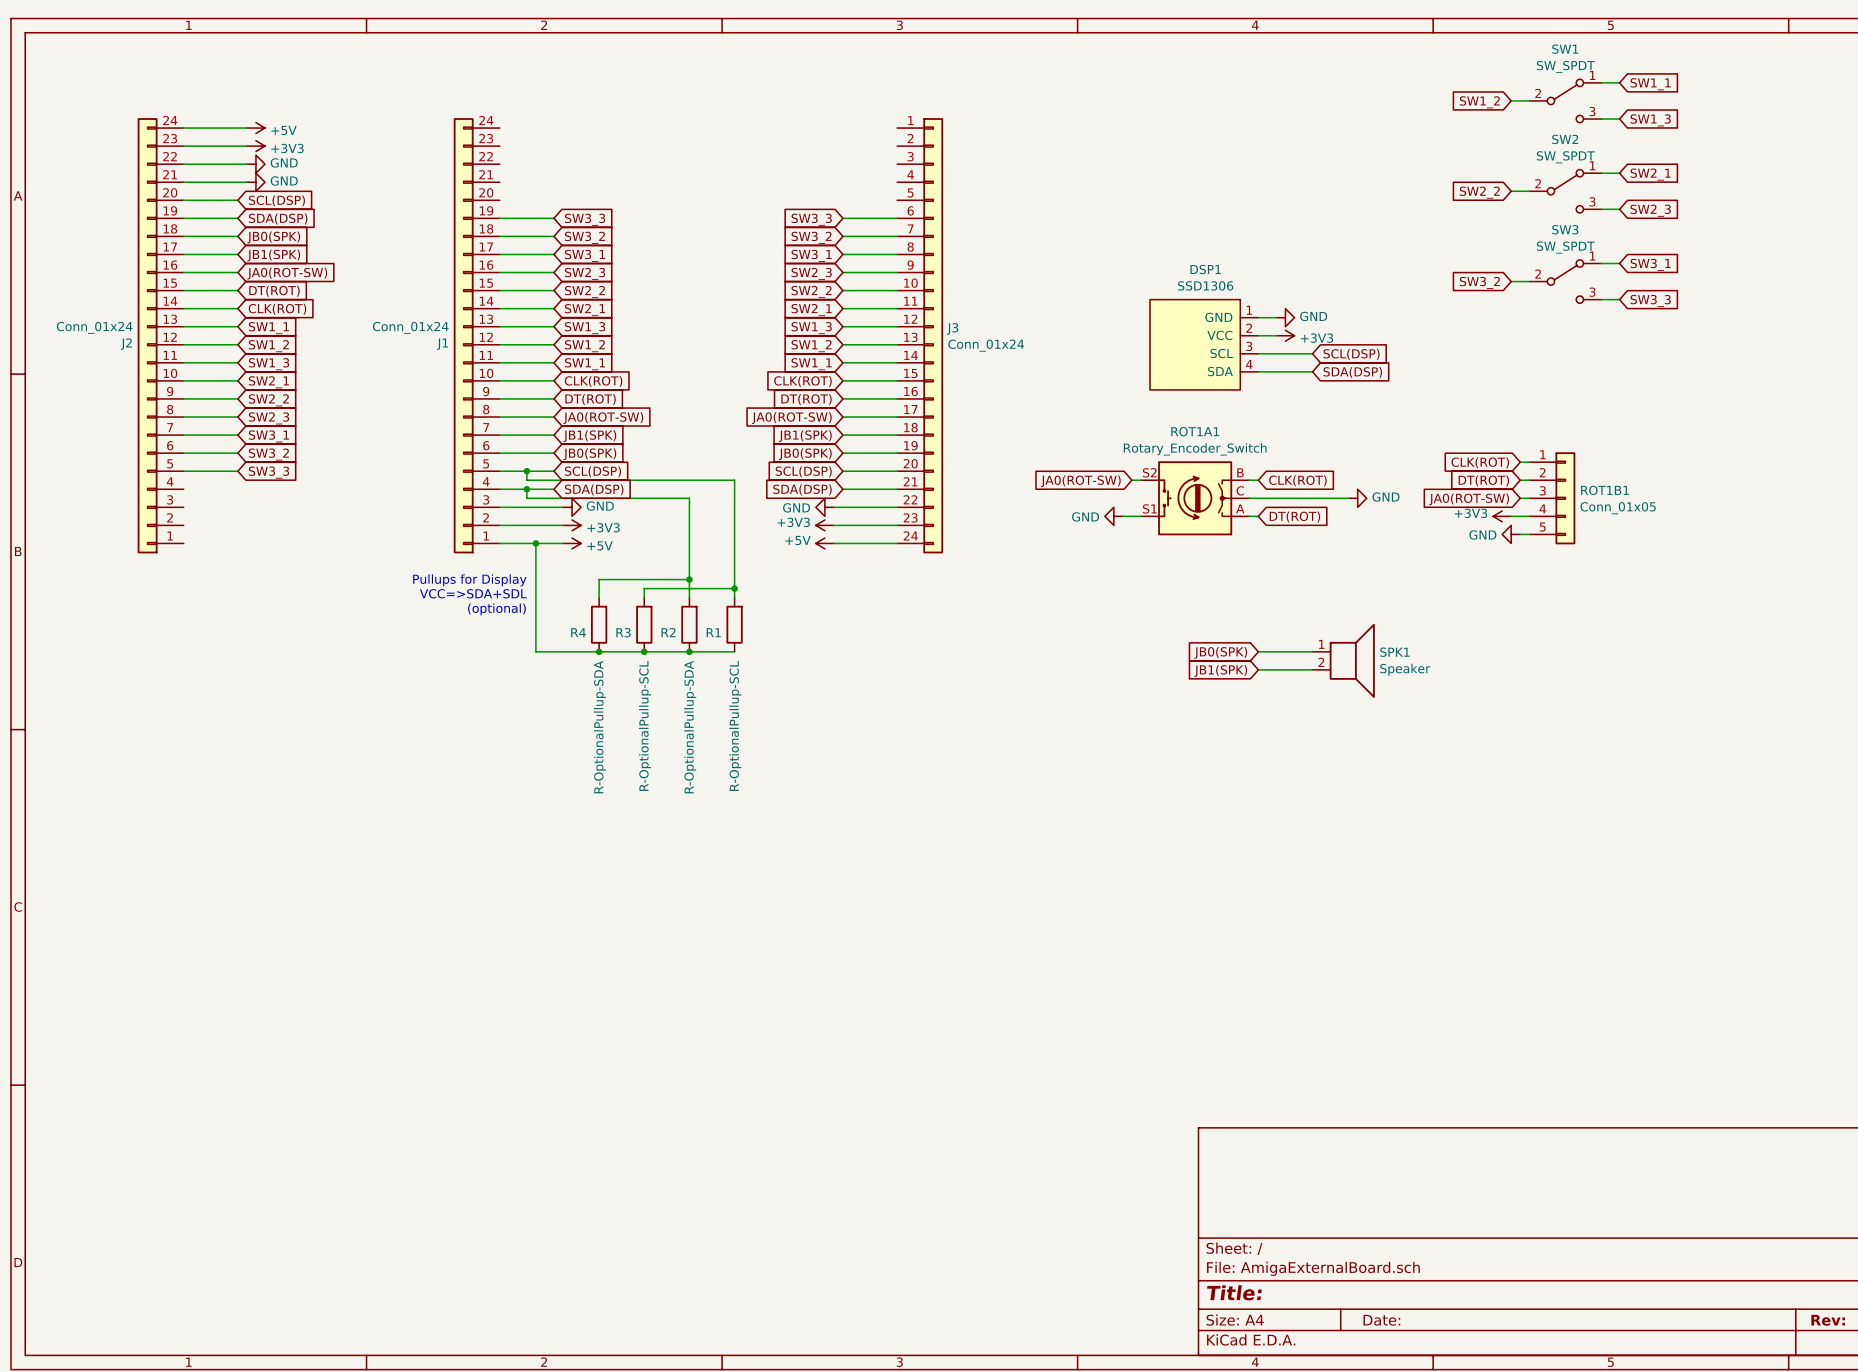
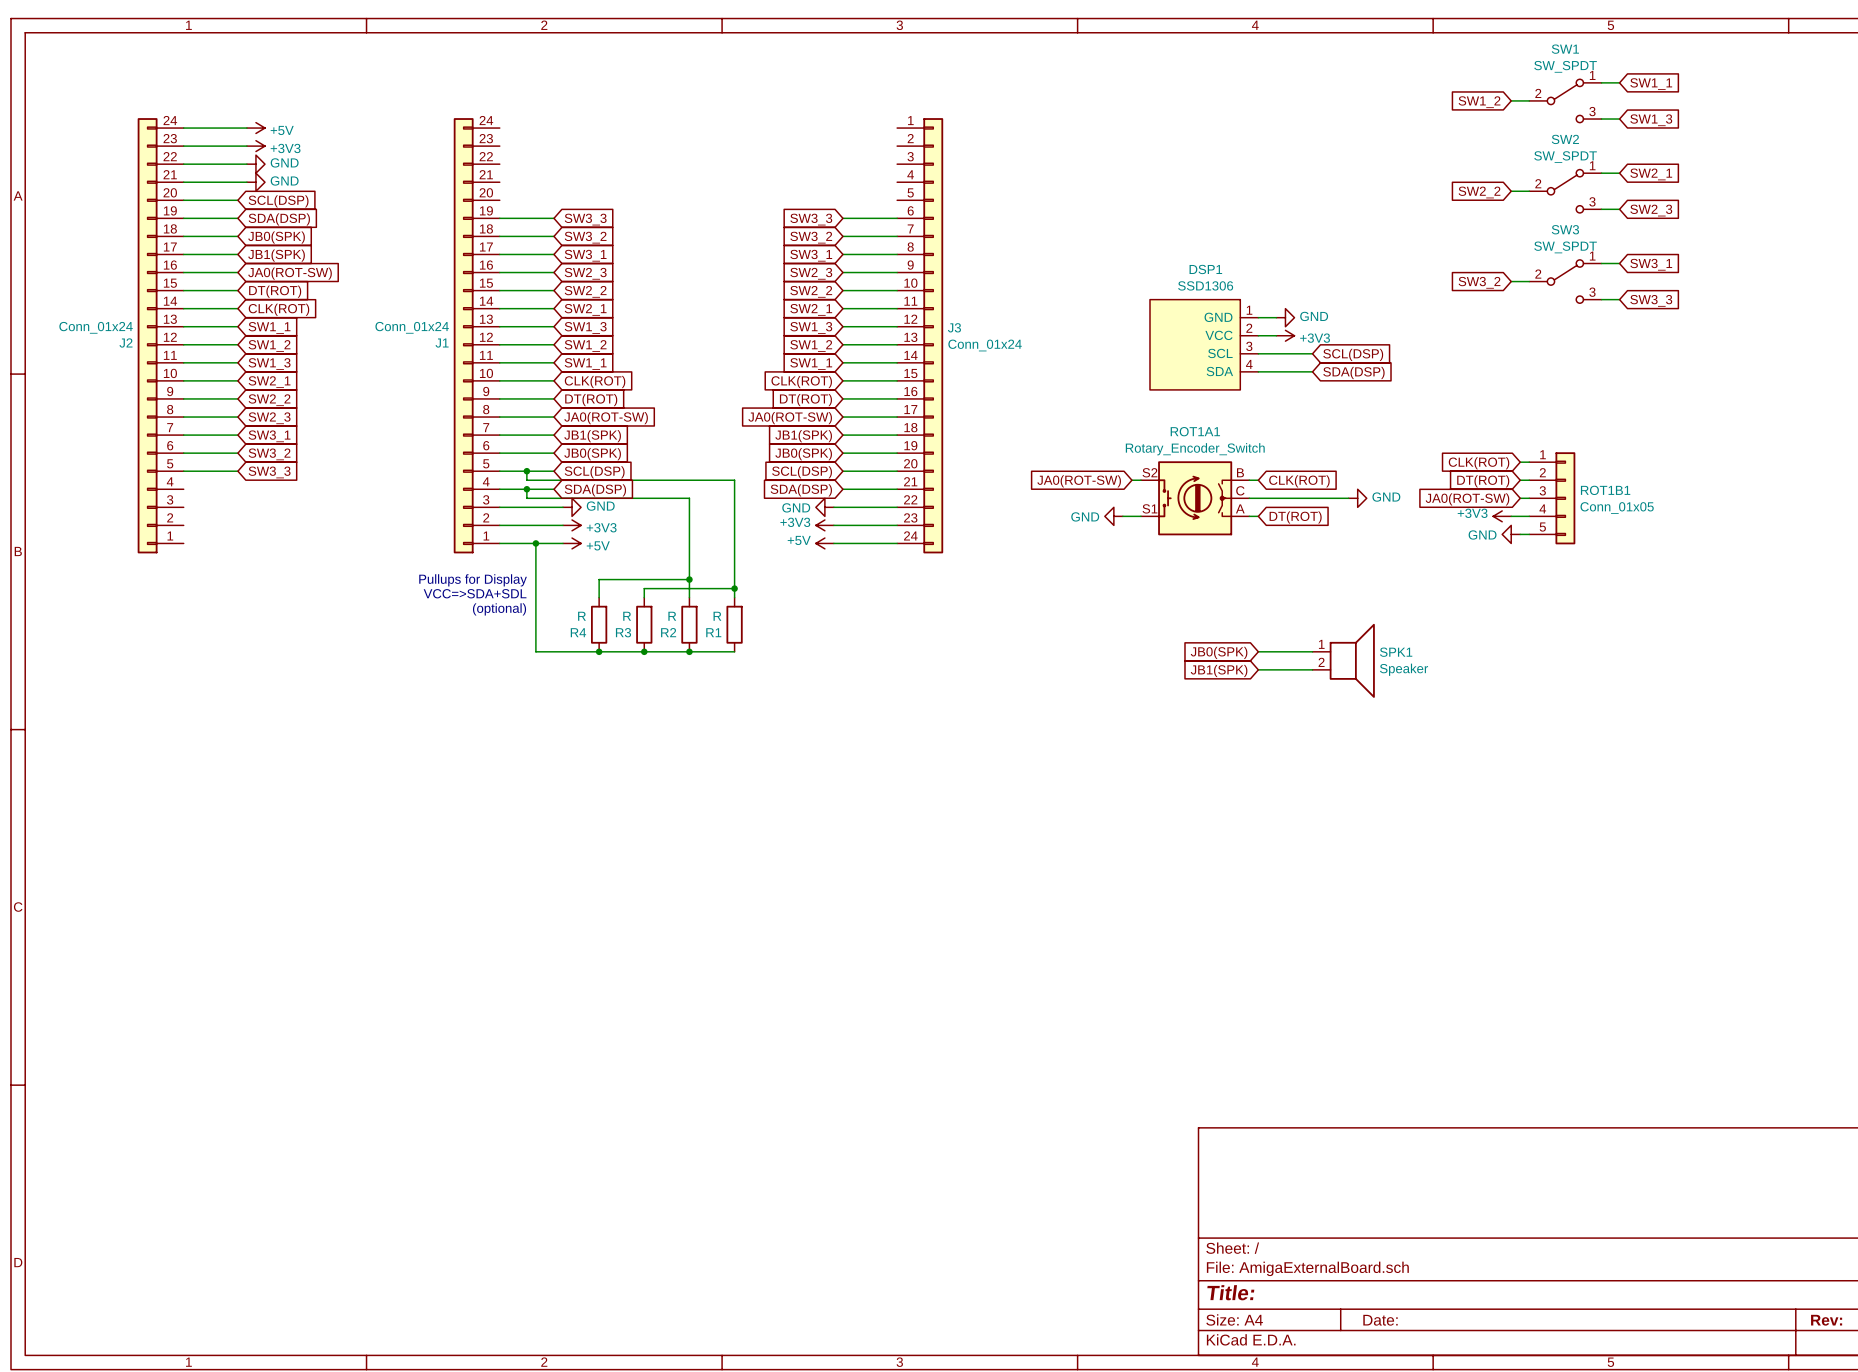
R3 value: R-OptionalPullup-SCL (645, 725) -> R (627, 616)
R1 value: R-OptionalPullup-SCL (735, 725) -> R (717, 616)
R4 value: R-OptionalPullup-SDA (599, 727) -> R (581, 616)
R2 value: R-OptionalPullup-SDA (690, 727) -> R (672, 616)

